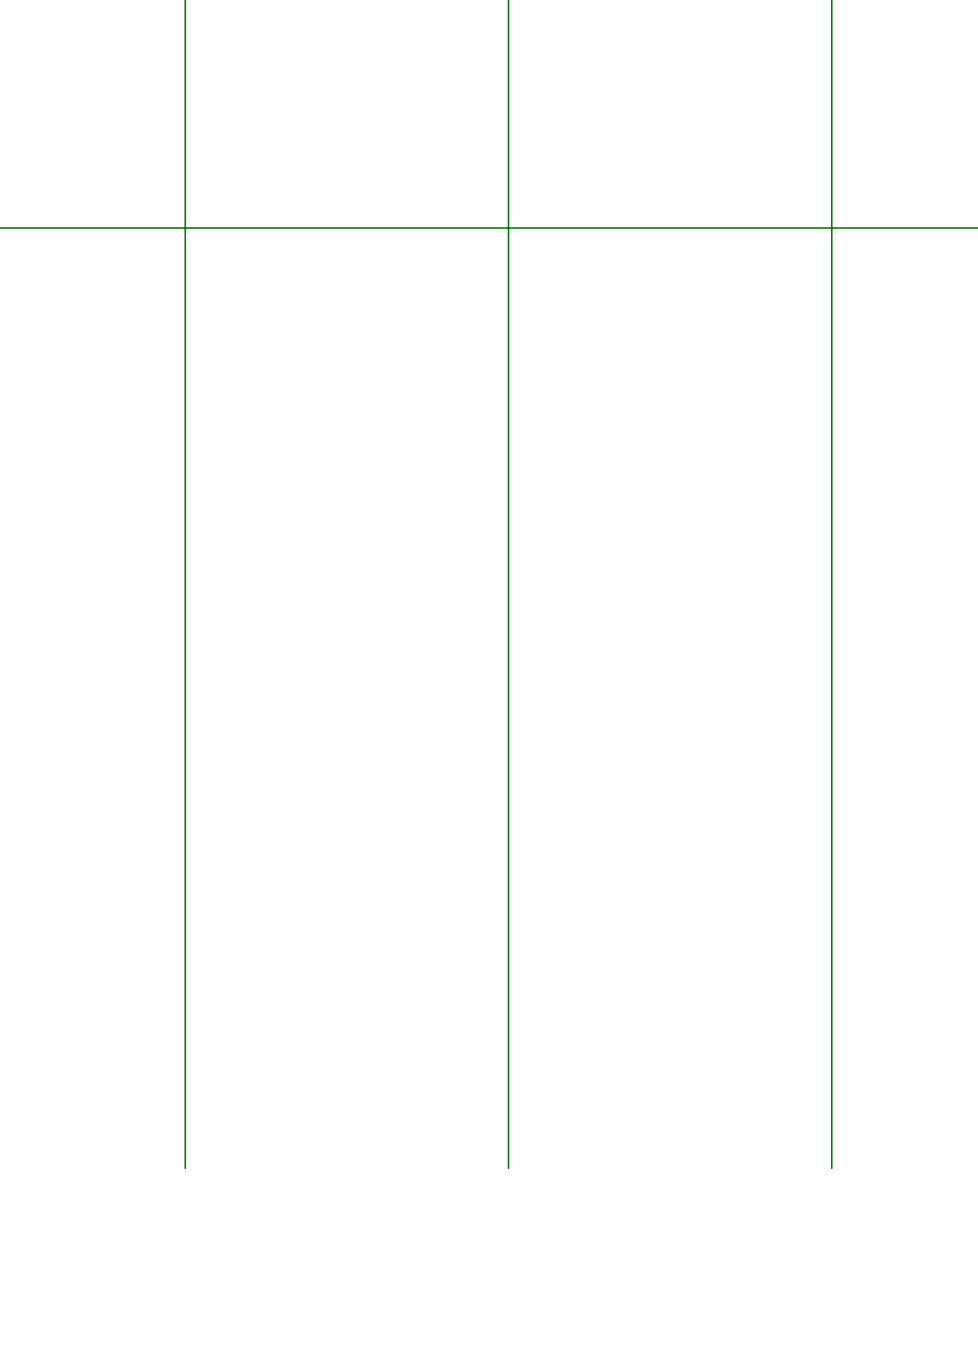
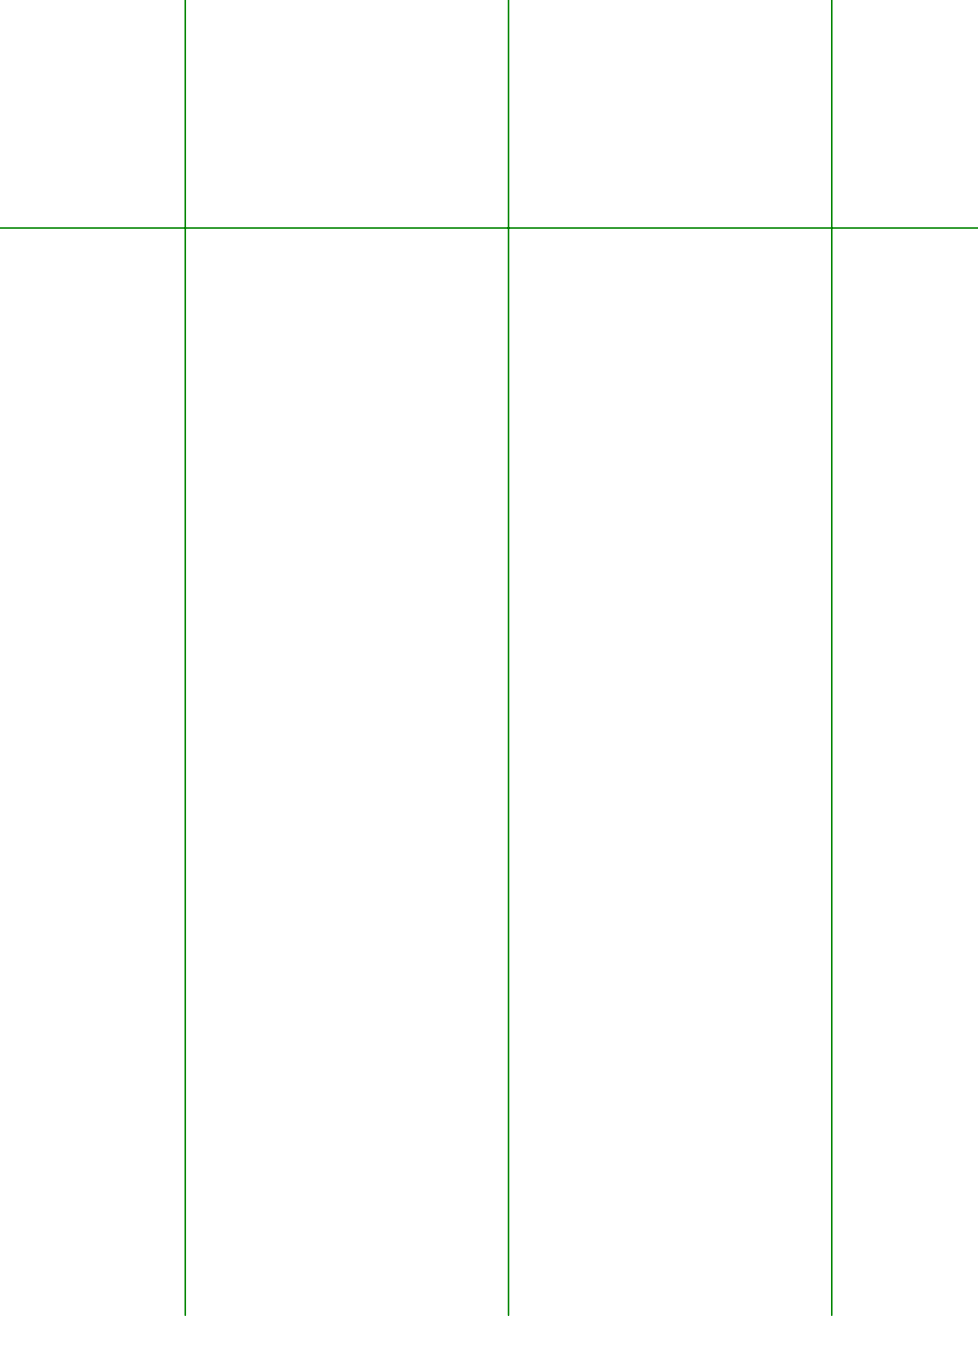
wire: none -> (185, 1168) (185, 1315)
wire: none -> (508, 1168) (508, 1315)
wire: none -> (831, 1168) (831, 1315)

